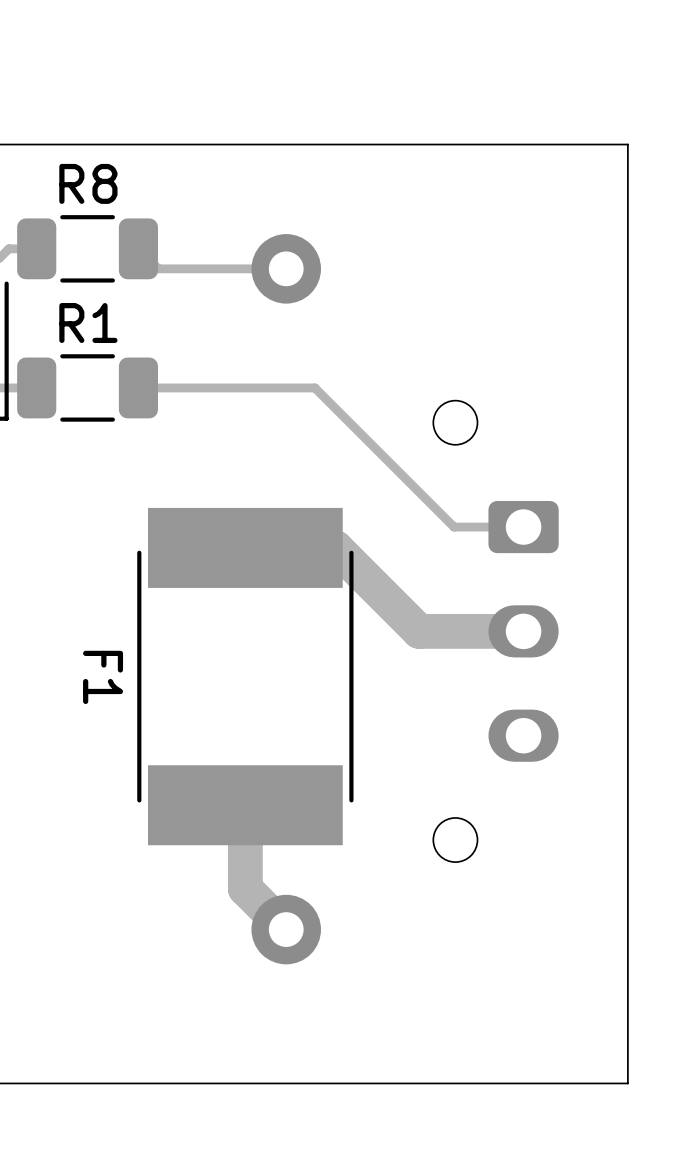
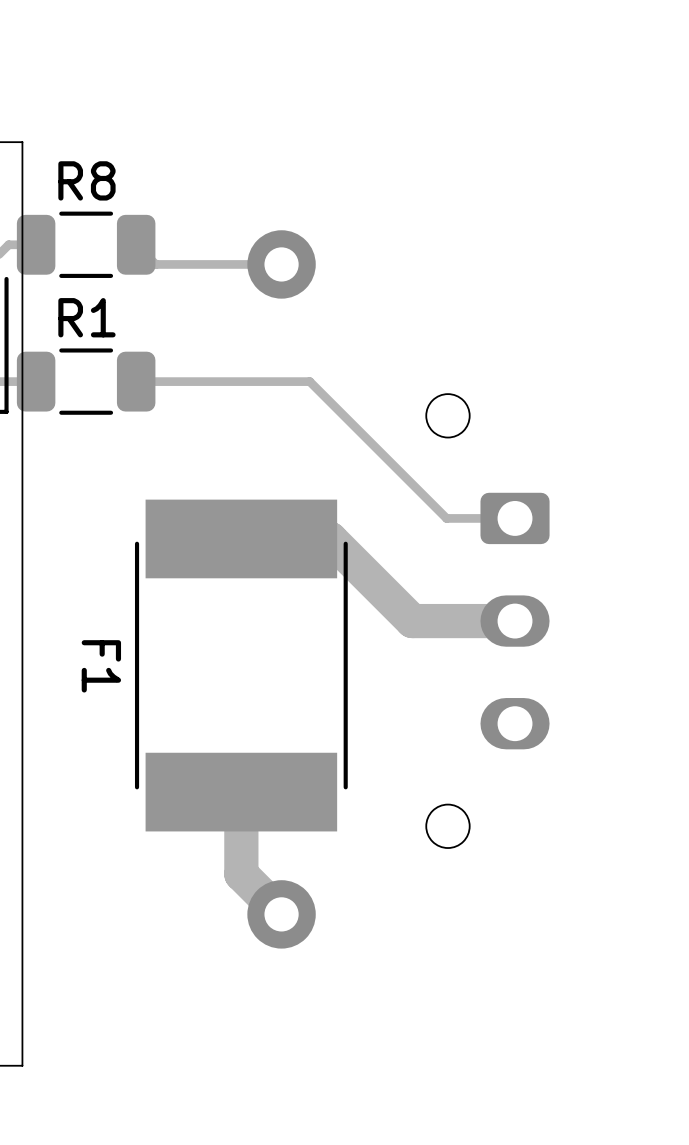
board edge: (22, 144) (627, 144) (627, 1083) (22, 1083) -> (22, 142) (22, 1065)

